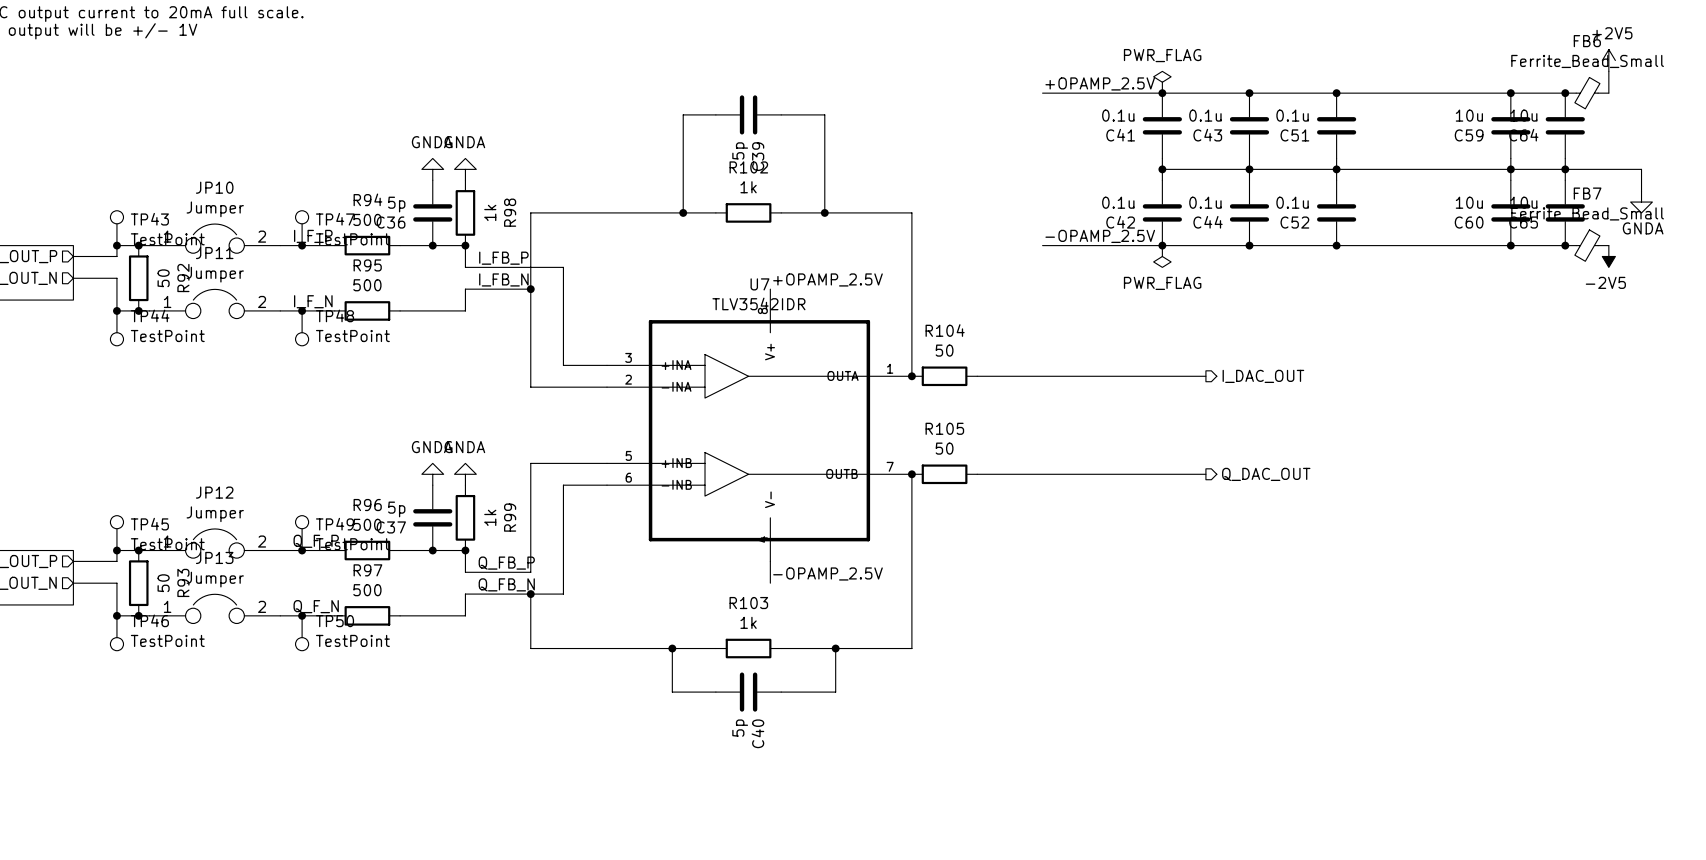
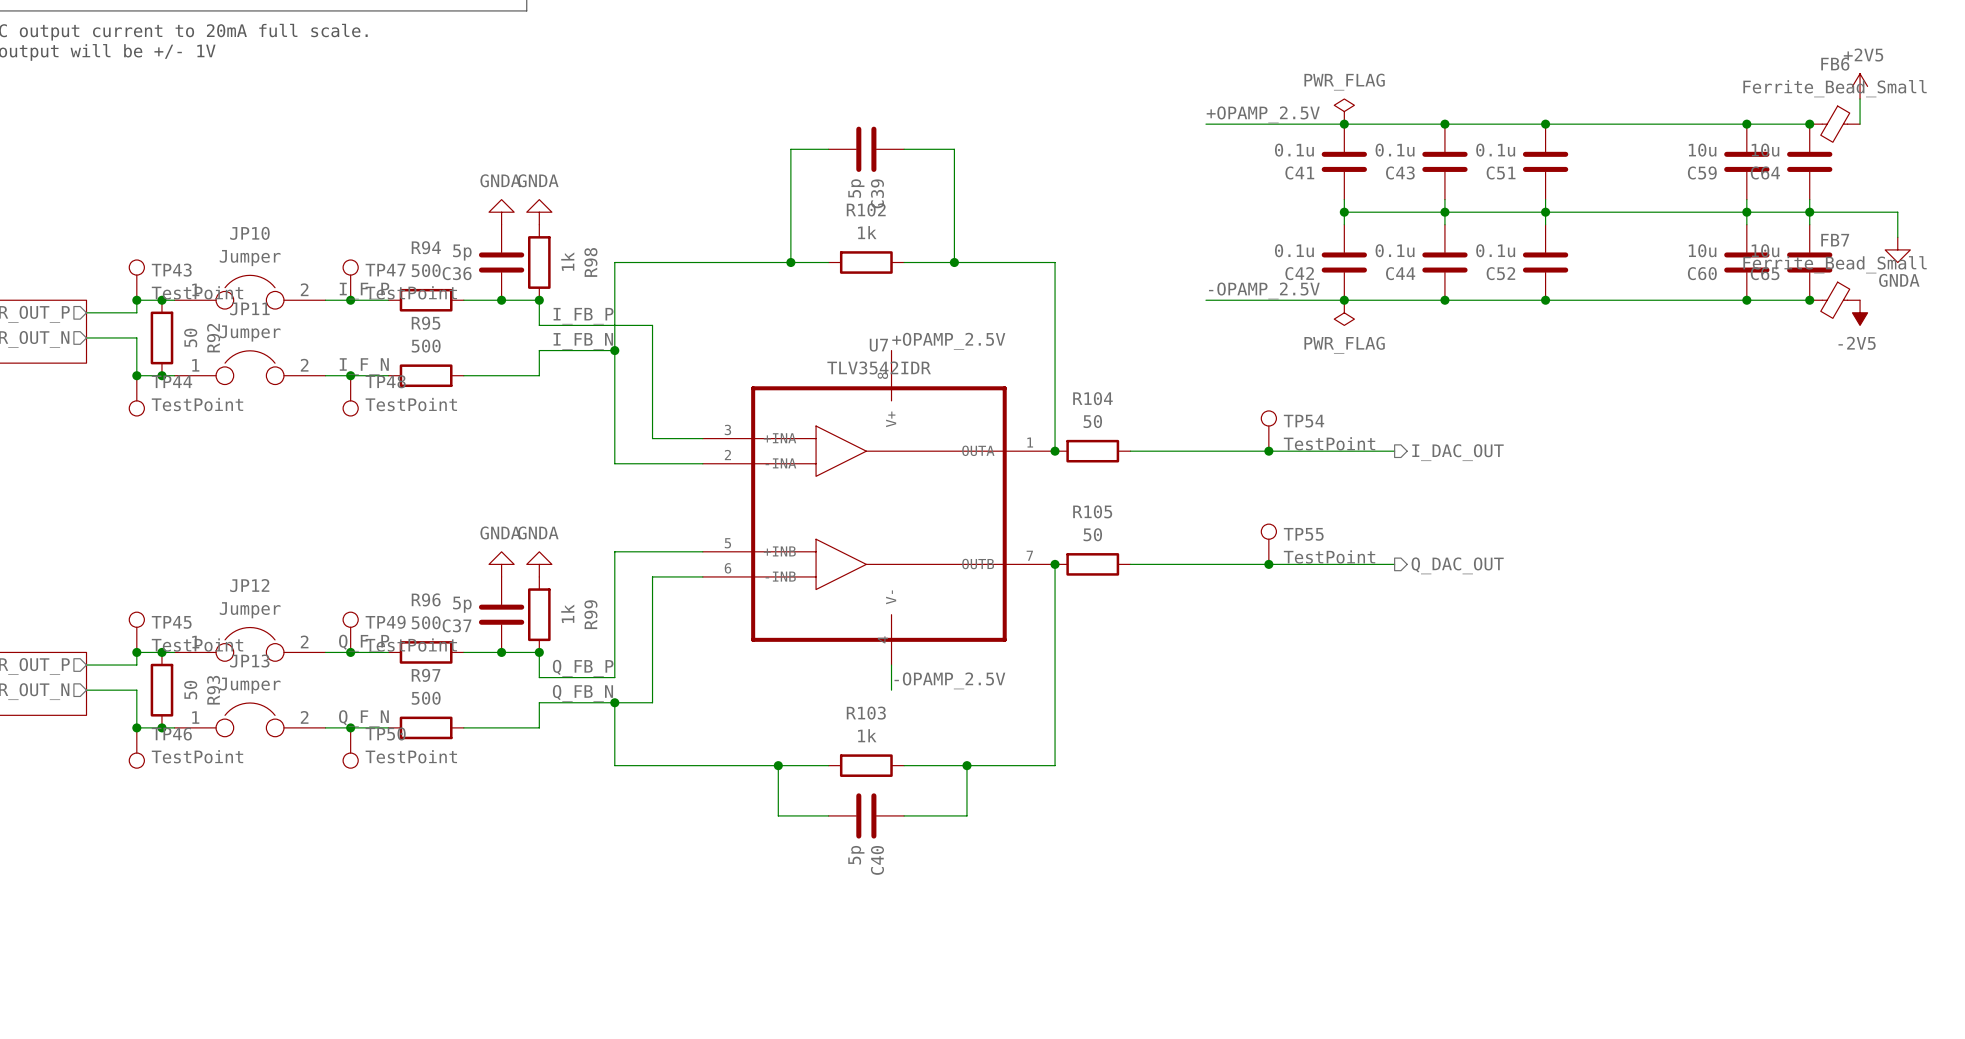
TP54: none -> TestPoint (1268, 431)
junction: none -> (1268, 451)
TP55: none -> TestPoint (1268, 544)
junction: none -> (1268, 564)

